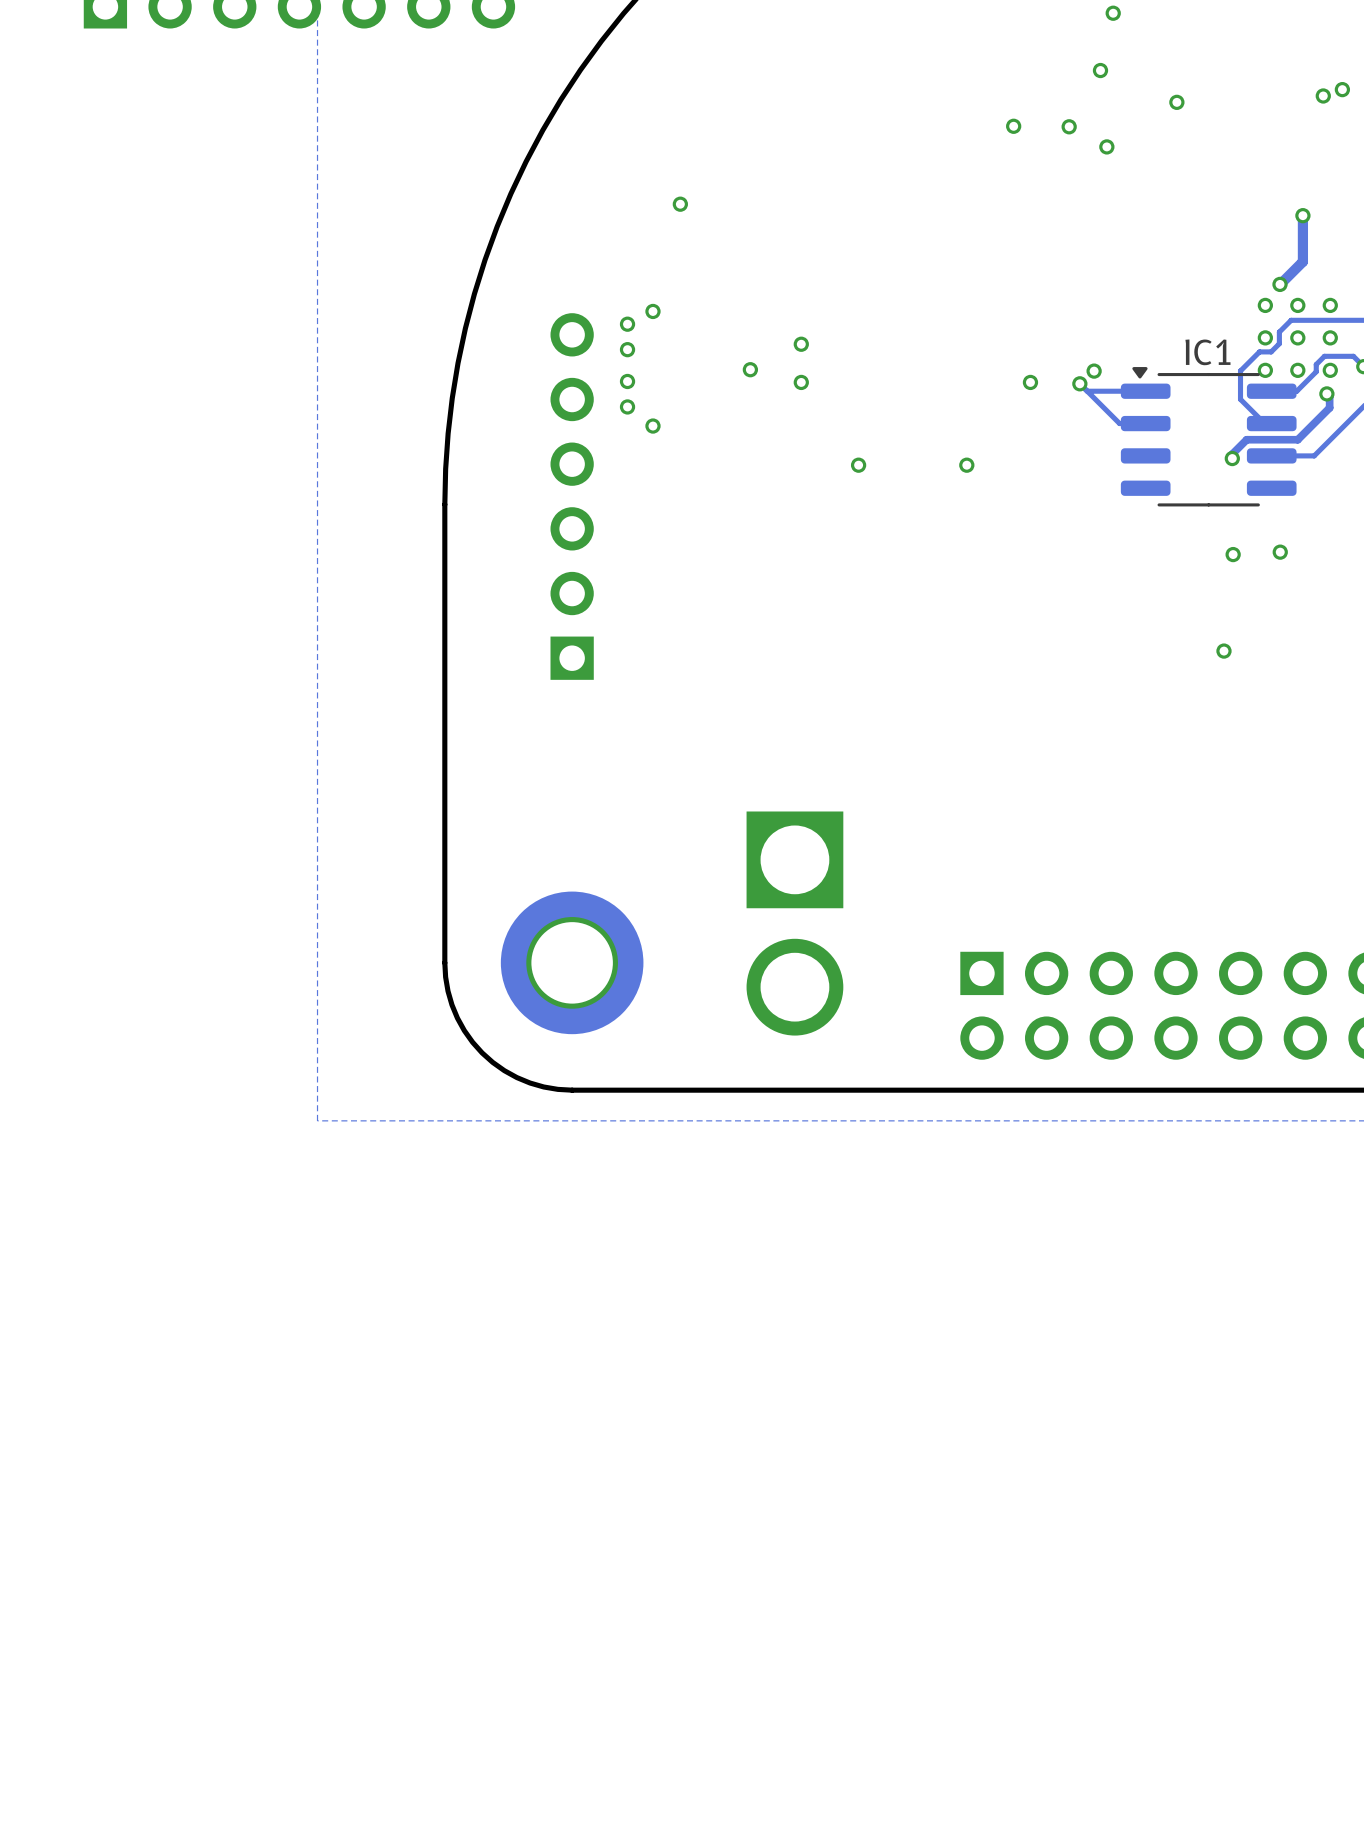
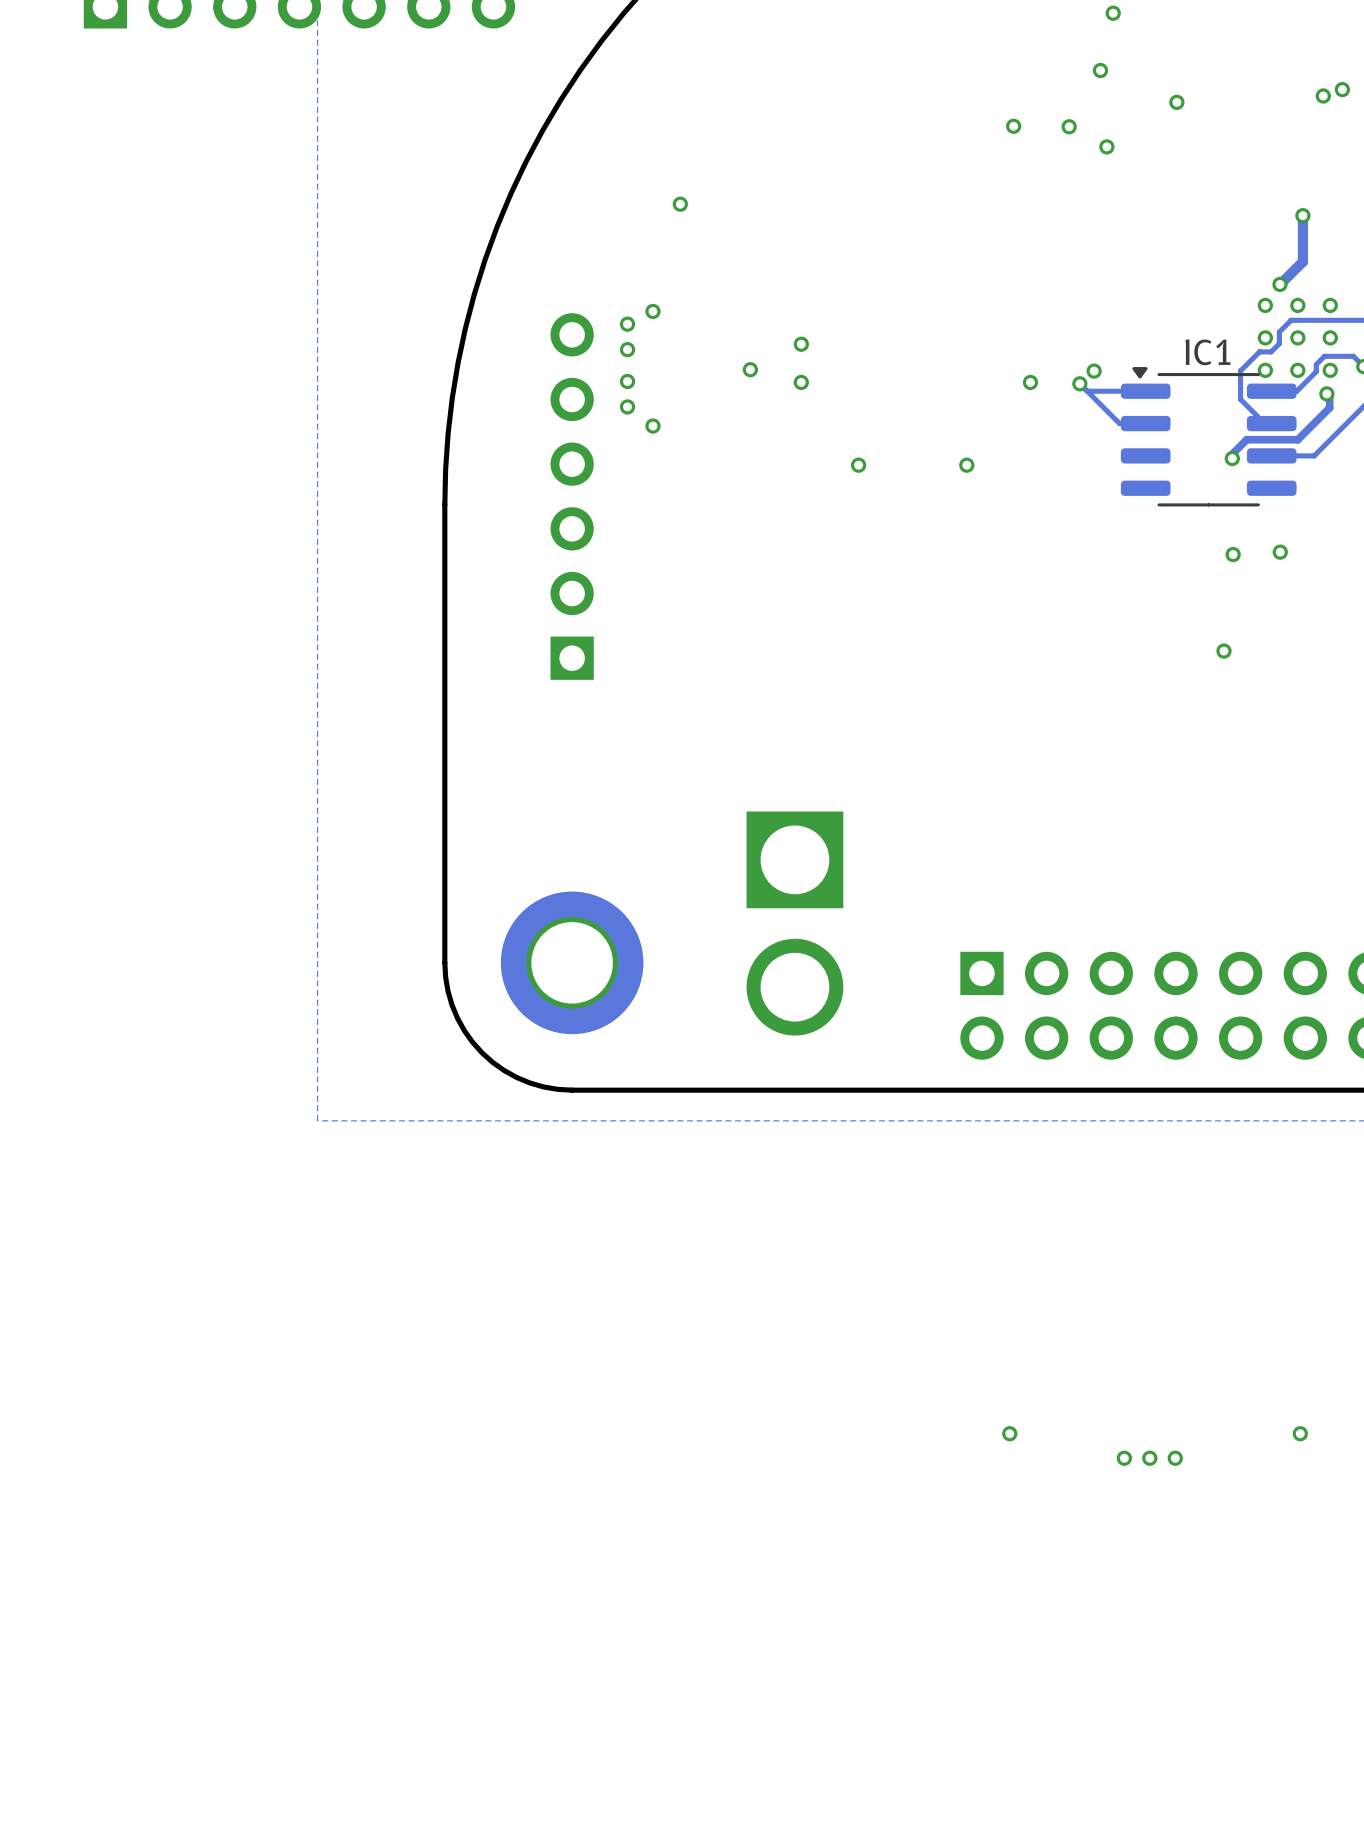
via: none -> (1009, 1433)
via: none -> (1300, 1433)
via: none -> (1124, 1458)
via: none -> (1149, 1458)
via: none -> (1175, 1458)

